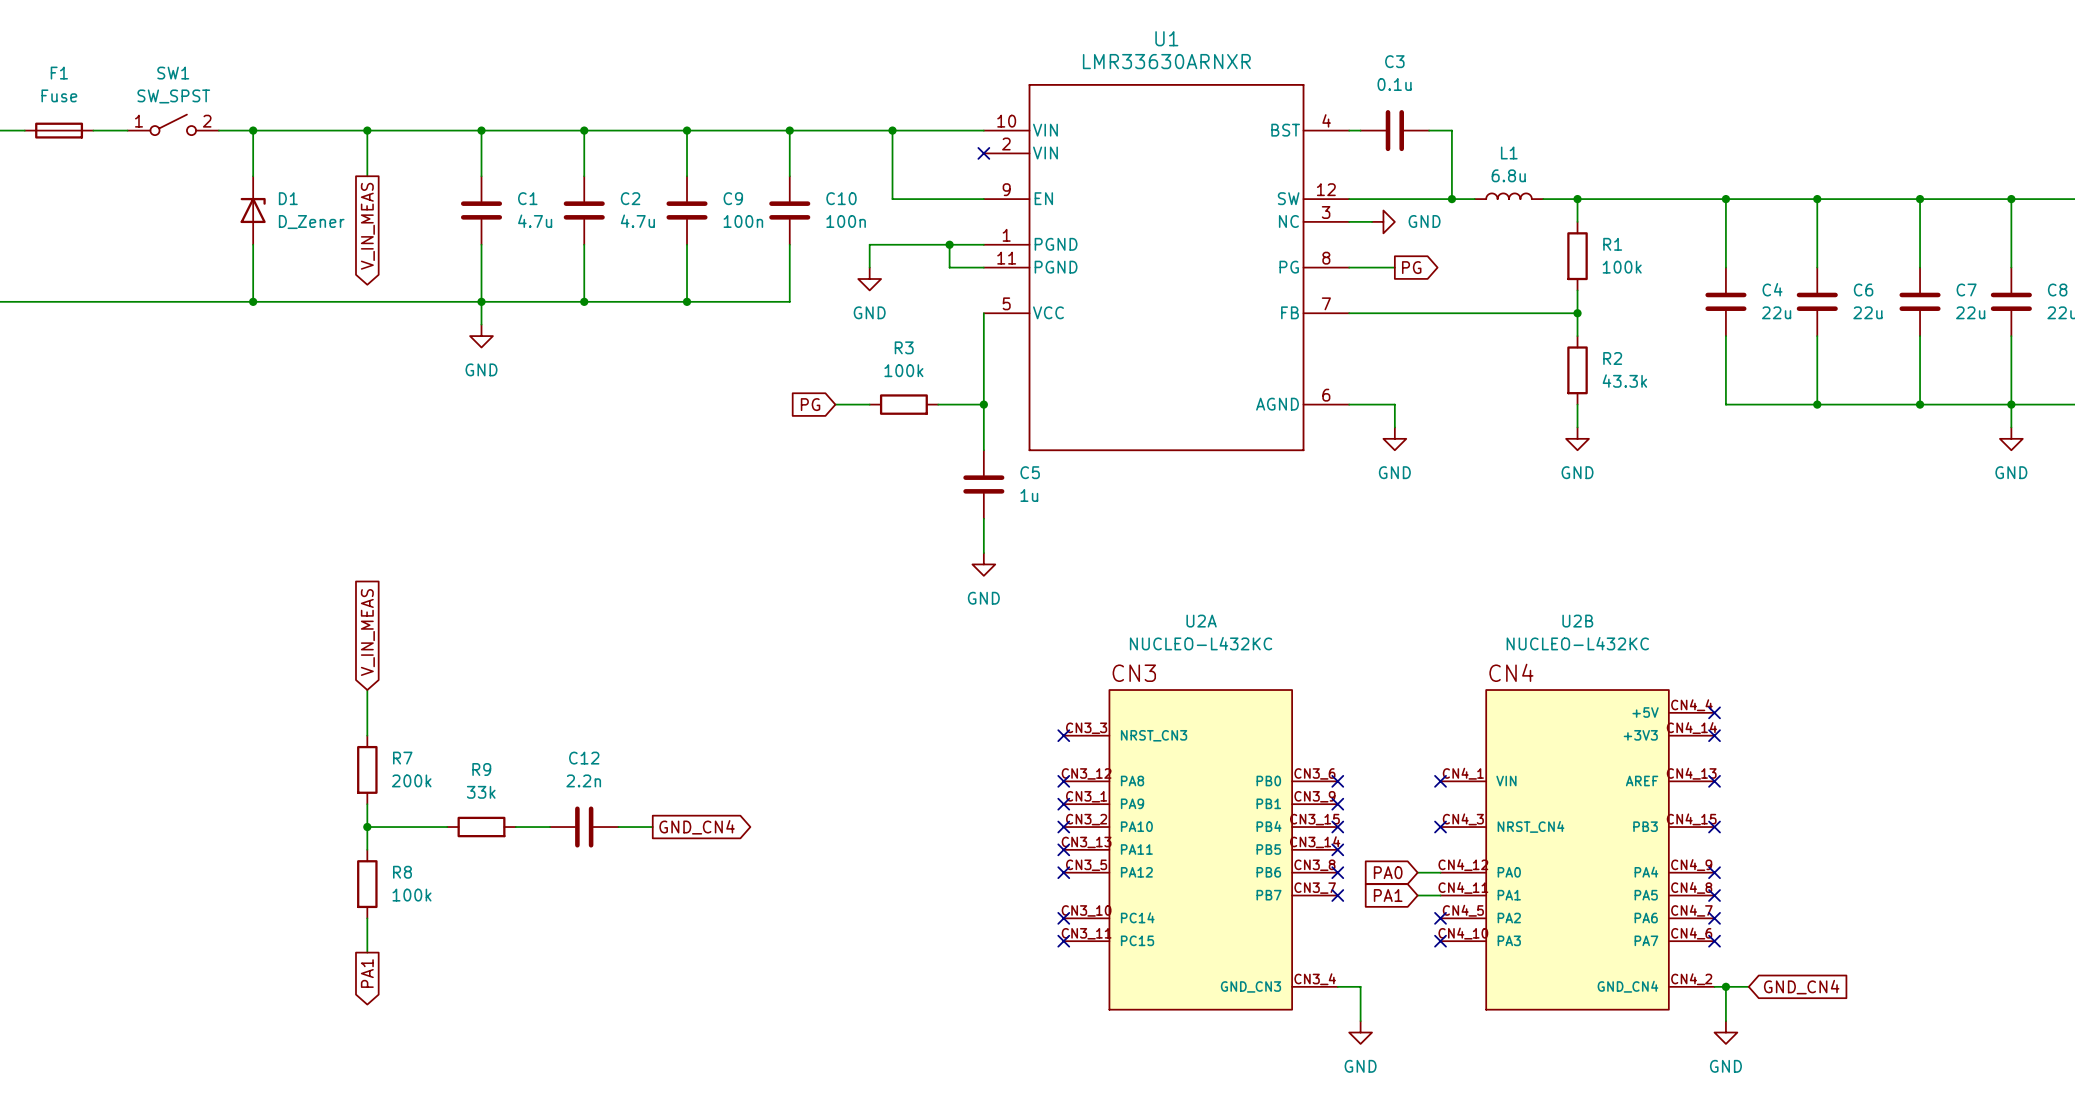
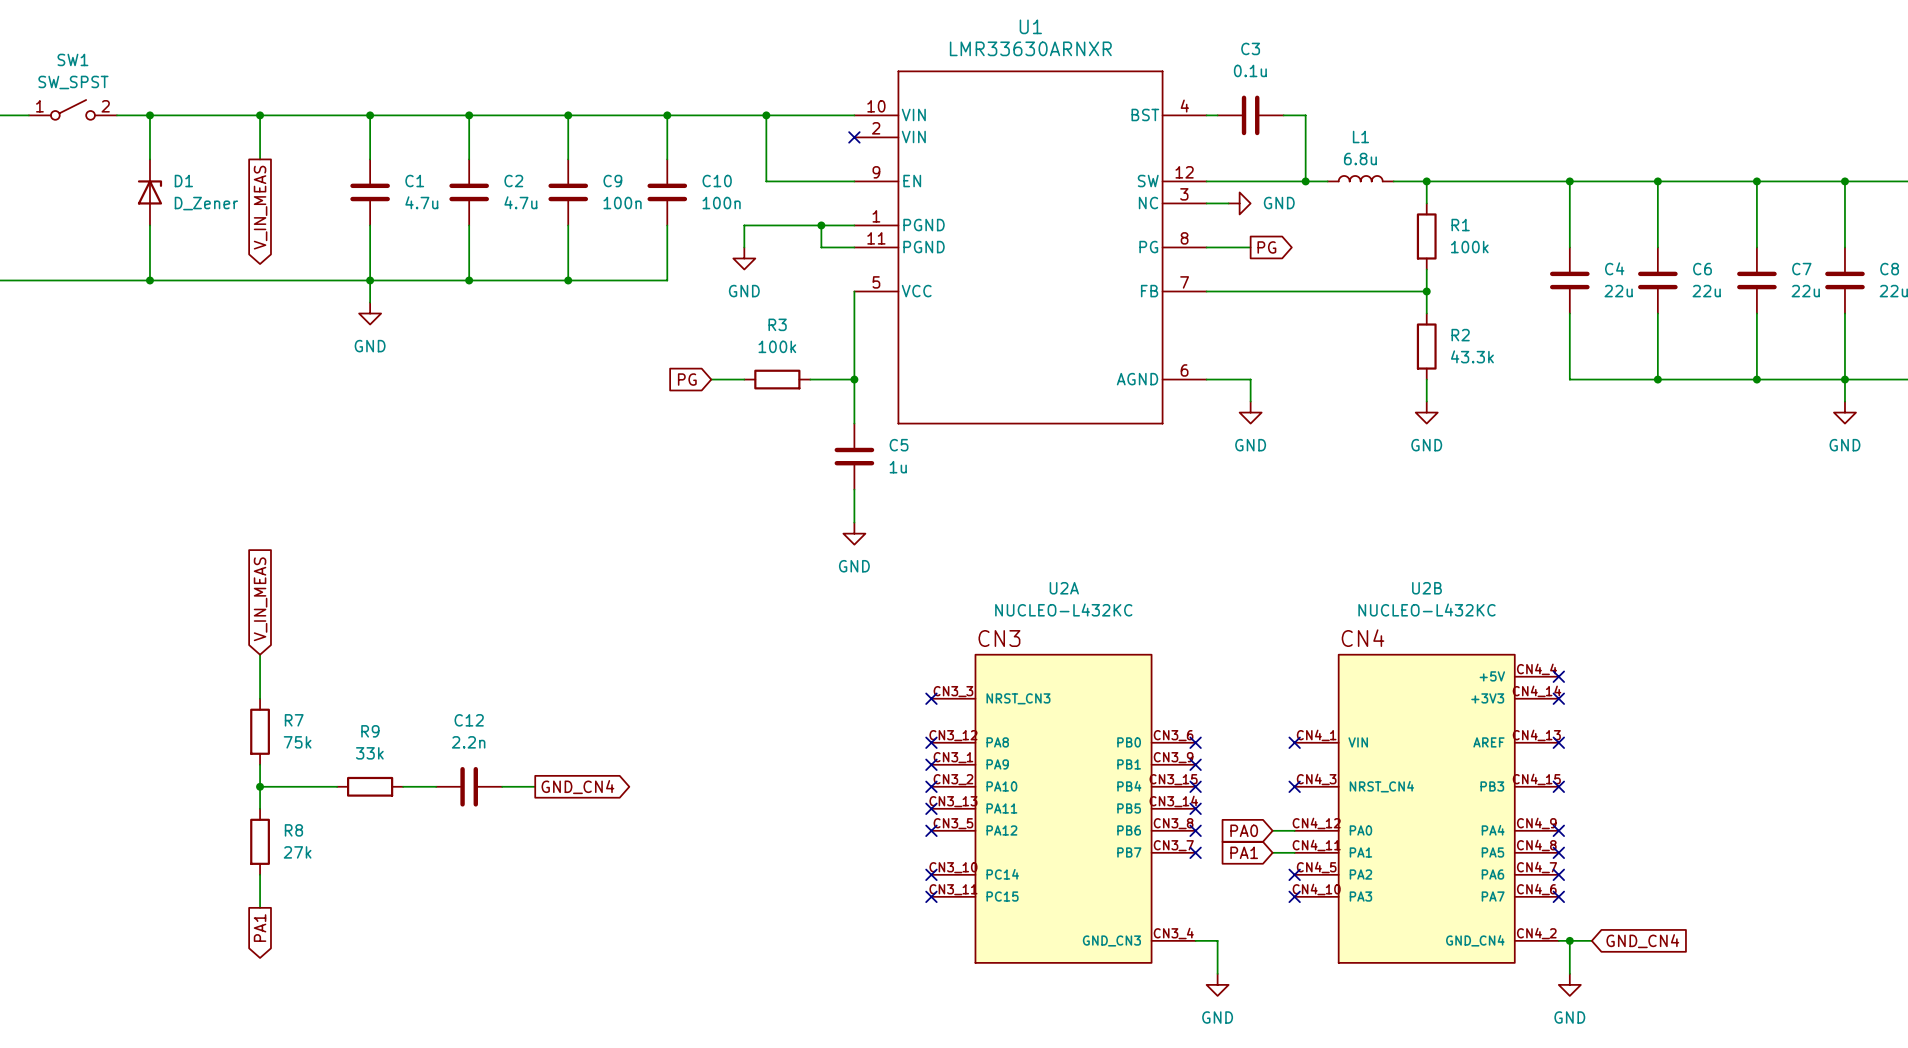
R7 value: 200k (411, 780) -> 75k (297, 742)
R8 value: 100k (412, 895) -> 27k (297, 852)

